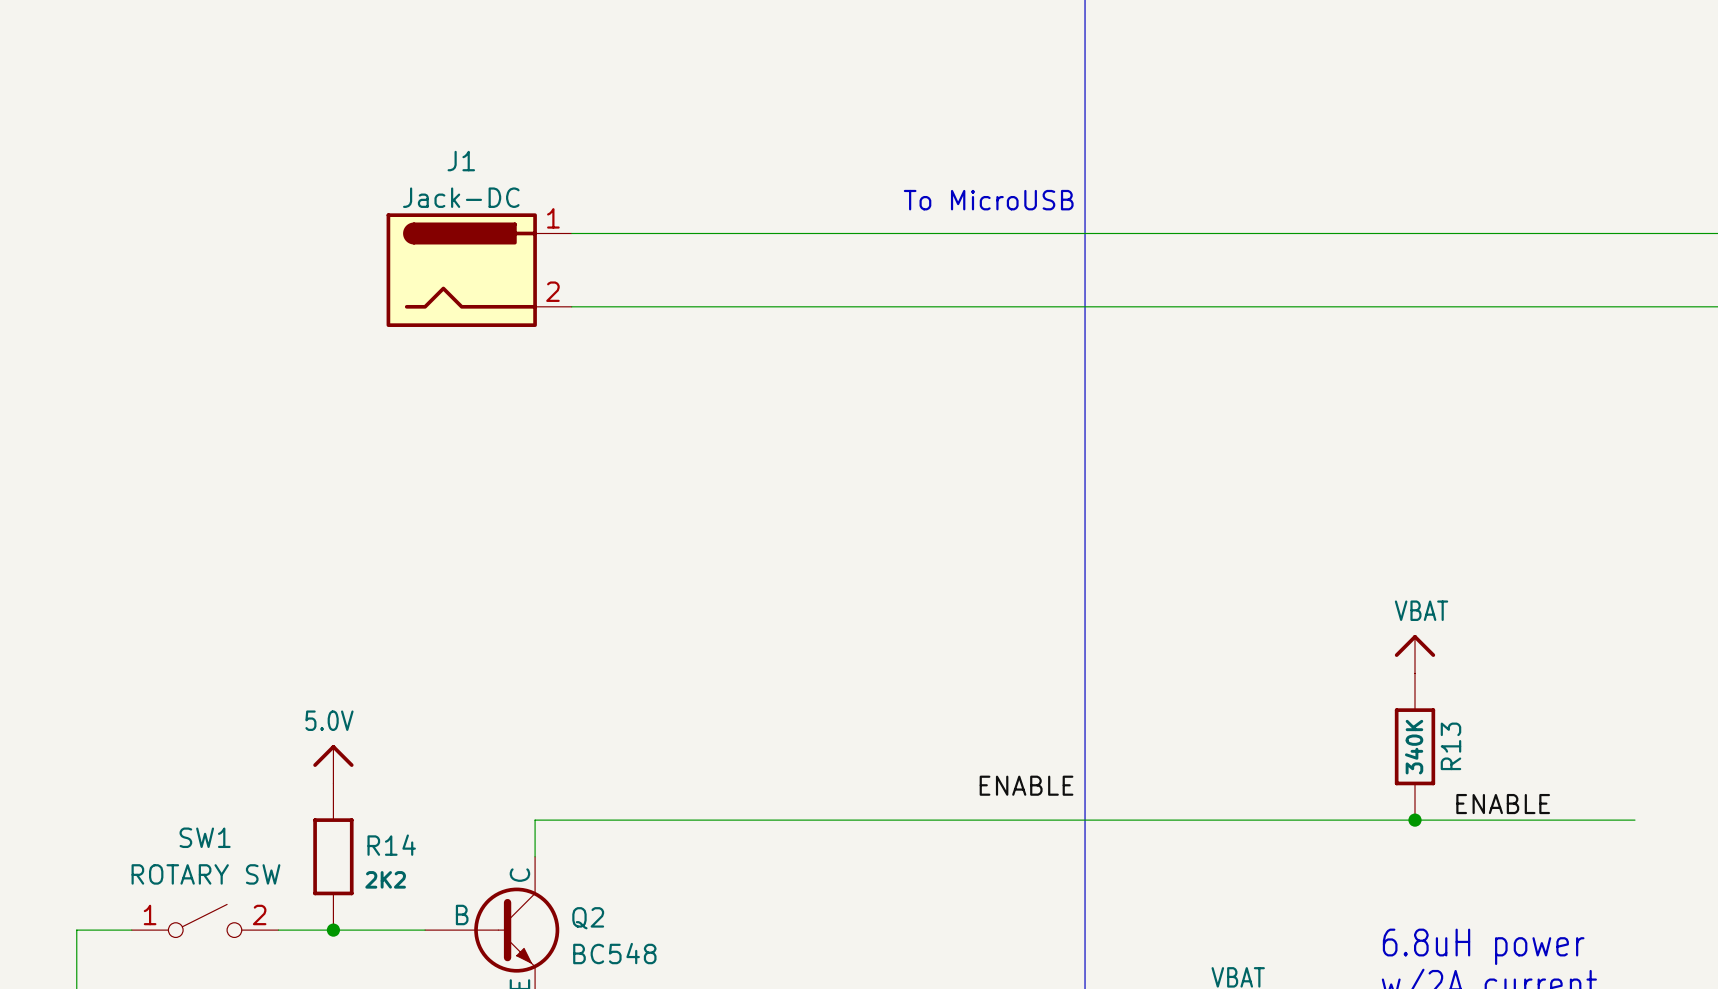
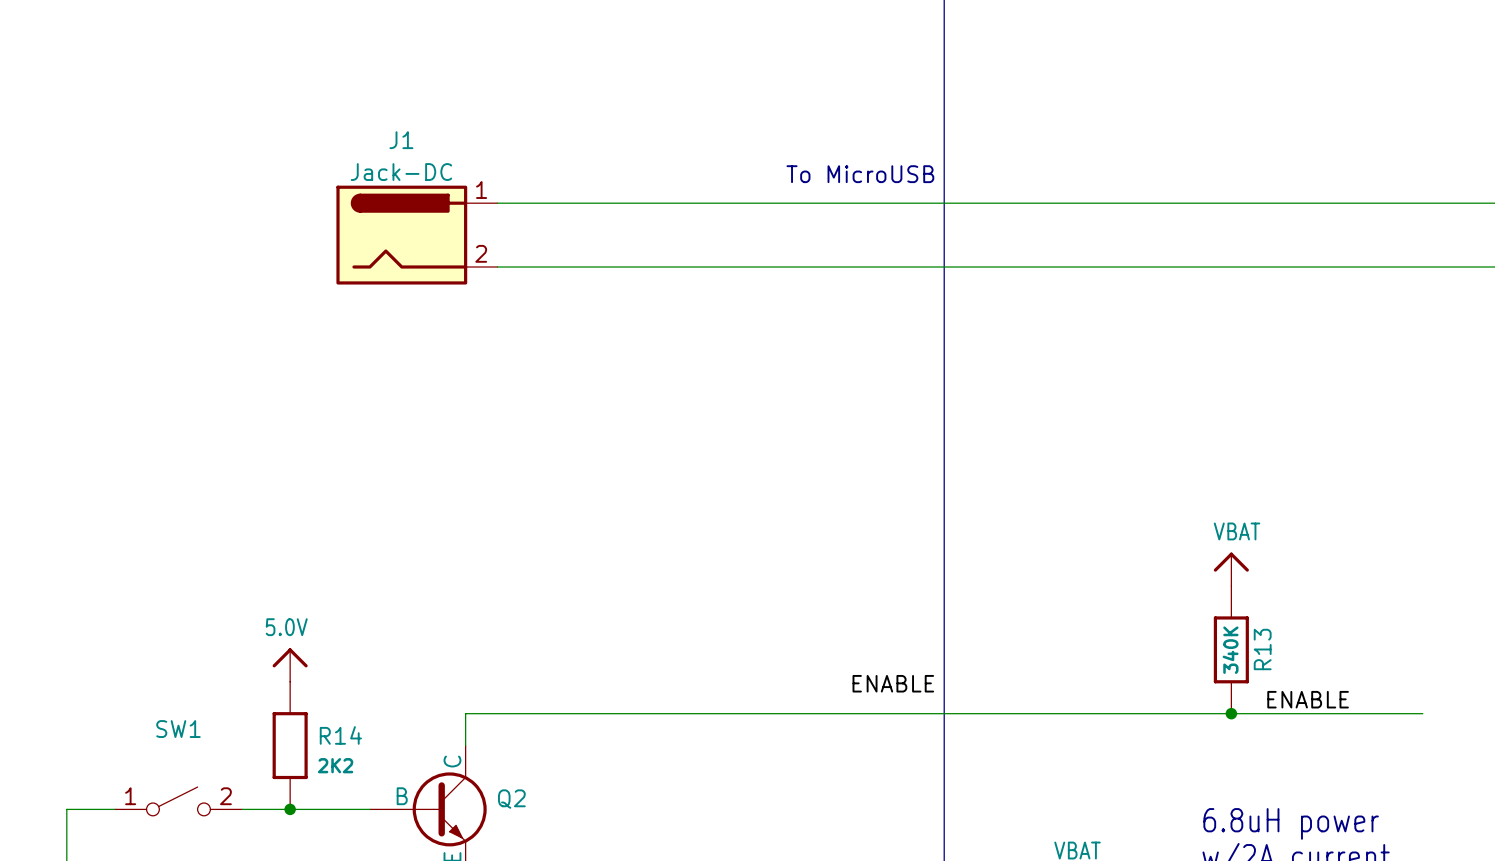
SW1 value: ROTARY SW (205, 874) -> none
Q2 value: BC548 (614, 953) -> none

